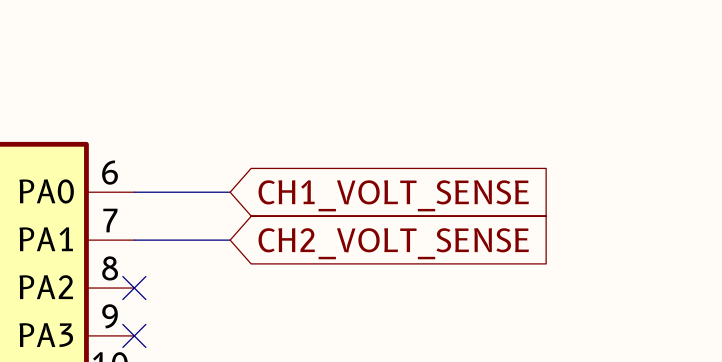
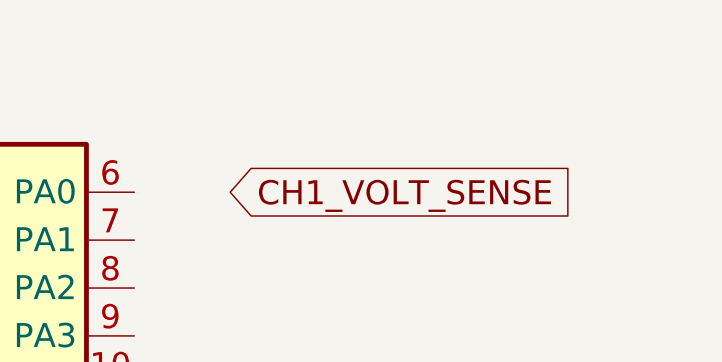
wire: (134, 192) (230, 192) -> none
wire: (134, 240) (230, 240) -> none
global label: CH2_VOLT_SENSE (393, 243) -> none
no-connect mark: (134, 288) -> none
no-connect mark: (134, 335) -> none

